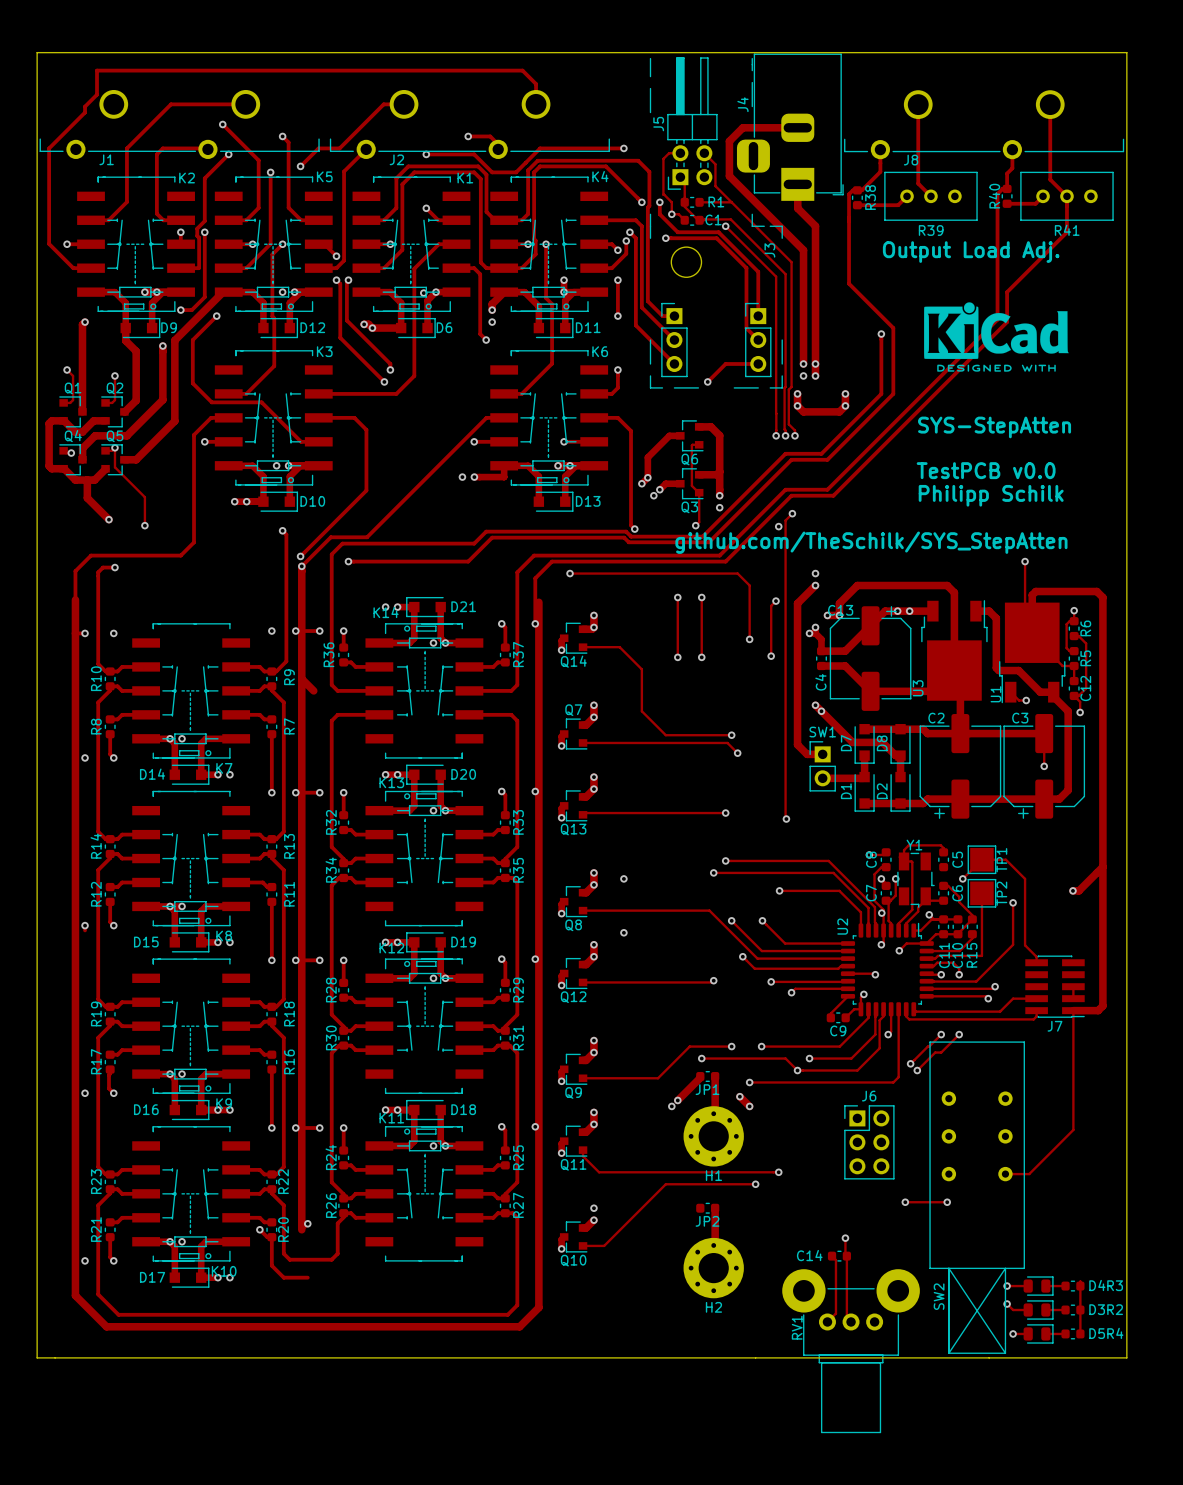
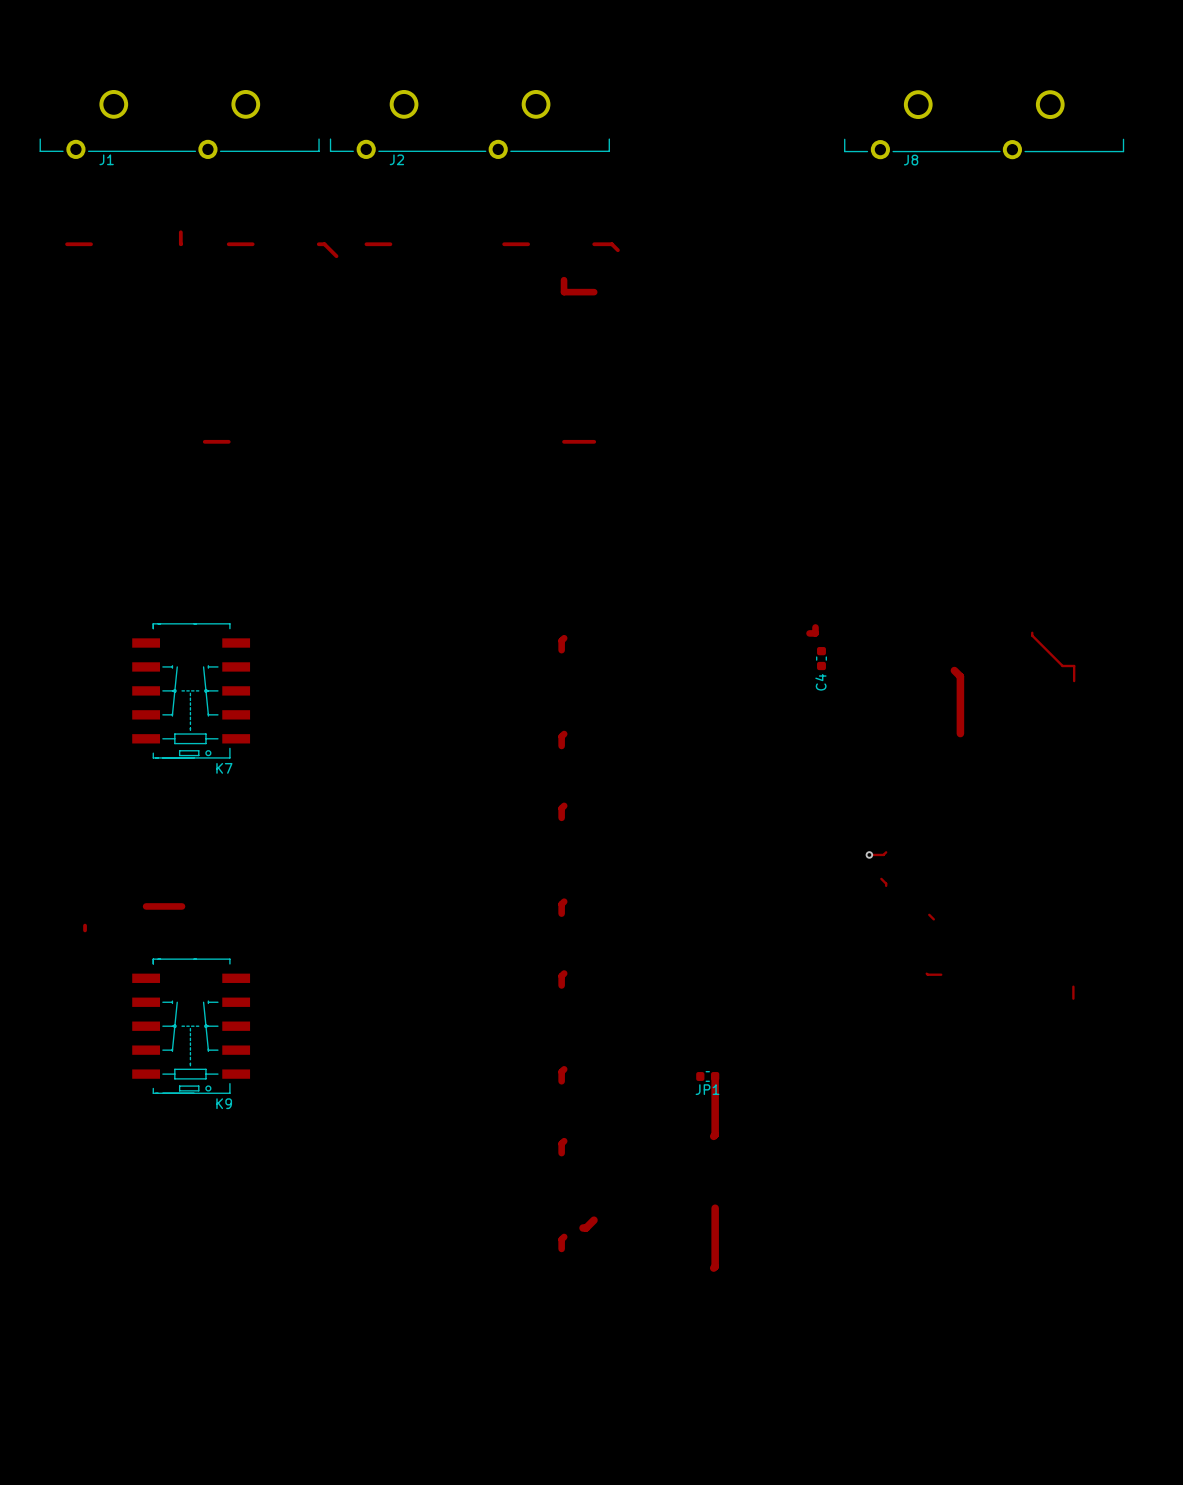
board edge: (37, 52) (37, 1357) (1126, 1357) (1126, 52) (37, 52) -> none
track: (245, 104) (171, 104) (126, 148) (126, 202) (108, 220) (91, 220) -> none
track: (404, 104) (383, 104) (339, 148) (318, 148) (300, 166) -> none
track: (536, 104) (536, 84) (522, 70) (97, 70) (97, 94) (85, 106) (85, 112) (49, 148) (49, 243) (73, 268) (91, 268) -> none
track: (918, 104) (918, 183) (930, 196) -> none
track: (1050, 104) (1050, 179) (1066, 196) (1066, 232) (1007, 292) (1007, 322) (833, 495) (791, 495) (725, 561) (552, 561) (535, 578) (535, 623) -> none
J5: (692, 123) -> none
track: (222, 124) (258, 160) (258, 208) (246, 220) (228, 220) -> none
via: (222, 124) -> none
J4: (790, 127) -> none
track: (797, 127) (742, 127) (729, 141) (729, 176) (803, 250) (803, 363) -> none
track: (282, 136) (288, 142) (288, 207) (301, 220) (318, 220) -> none
via: (282, 136) -> none
track: (468, 136) (490, 136) (503, 149) (498, 149) -> none
via: (468, 136) -> none
track: (623, 148) (540, 148) (516, 172) (492, 172) (474, 154) (426, 154) -> none
via: (623, 148) -> none
track: (207, 149) (209, 149) (162, 148) (156, 154) (156, 213) (163, 220) (181, 220) -> none
track: (366, 149) (344, 171) (344, 260) (336, 268) (318, 268) -> none
track: (880, 149) (880, 171) (861, 190) (852, 190) (849, 194) (849, 283) (893, 328) (893, 393) (827, 459) (791, 459) (709, 542) (628, 542) (624, 537) (492, 537) (468, 561) (348, 561) -> none
track: (1012, 149) (1012, 168) (1007, 173) (1007, 188) (1002, 188) (997, 194) (997, 319) (827, 489) (785, 489) (719, 555) (534, 555) (517, 572) (517, 684) (511, 690) (469, 690) -> none
track: (680, 153) (669, 153) (663, 158) (663, 194) (671, 202) (671, 214) (678, 214) (684, 220) -> none
track: (704, 153) (715, 164) (715, 186) (791, 262) (791, 387) (788, 389) (788, 424) (794, 430) (794, 435) -> none
track: (228, 154) (204, 178) (204, 221) (197, 228) (199, 267) (181, 268) -> none
via: (228, 154) -> none
via: (426, 154) -> none
via: (300, 166) -> none
track: (270, 172) (270, 243) (246, 268) (228, 268) -> none
via: (270, 172) -> none
track: (680, 177) (684, 181) (684, 206) (698, 220) (730, 219) (785, 274) (785, 435) -> none
track: (797, 184) (797, 208) (815, 226) (815, 375) -> none
track: (907, 196) (898, 205) (857, 205) -> none
R39: (930, 196) -> none
R40: (1007, 196) -> none
track: (1043, 196) (1035, 203) (1007, 203) -> none
R41: (1066, 196) -> none
R38: (857, 197) -> none
track: (641, 202) (605, 166) (540, 166) (534, 172) (535, 254) (521, 268) (486, 268) (480, 262) (480, 179) (474, 172) (414, 172) (402, 184) (402, 249) (384, 268) (366, 268) -> none
via: (641, 202) -> none
track: (659, 202) (659, 214) (677, 232) (718, 232) (758, 271) (758, 316) -> none
via: (659, 202) -> none
R1: (692, 202) -> none
track: (699, 202) (731, 202) -> none
track: (426, 208) (438, 220) (456, 220) -> none
via: (426, 208) -> none
via: (671, 214) -> none
track: (366, 220) (384, 220) (396, 208) (396, 178) (408, 166) (478, 166) (486, 174) (486, 211) (494, 220) (521, 220) (528, 214) (528, 170) (537, 160) (638, 160) (649, 171) (647, 301) (662, 316) (674, 316) -> none
track: (594, 220) (635, 220) (641, 226) (641, 307) (674, 340) -> none
C1: (692, 220) -> none
J3: (716, 223) -> none
track: (725, 226) (776, 276) (776, 435) -> none
via: (725, 226) -> none
via: (180, 232) -> none
track: (204, 232) (204, 297) (191, 310) (180, 310) -> none
via: (204, 232) -> none
track: (629, 232) (635, 238) (635, 325) (674, 363) -> none
via: (629, 232) -> none
track: (665, 238) (716, 238) (746, 268) (746, 328) (758, 340) -> none
via: (665, 238) -> none
track: (626, 240) (626, 253) (611, 268) (594, 268) -> none
via: (626, 240) -> none
via: (67, 244) -> none
K2: (136, 244) -> none
via: (252, 244) -> none
K5: (273, 244) -> none
track: (282, 244) (272, 254) (274, 366) (246, 393) (228, 393) -> none
via: (282, 244) -> none
via: (390, 244) -> none
K1: (411, 244) -> none
track: (456, 244) (438, 244) (414, 268) (414, 375) (396, 393) (318, 393) -> none
via: (528, 244) -> none
track: (546, 244) (546, 298) (552, 304) (552, 363) (521, 393) (504, 393) -> none
via: (546, 244) -> none
K4: (549, 244) -> none
via: (617, 250) -> none
text: Output Load Adj. (971, 252) -> none
via: (336, 256) -> none
track: (456, 268) (474, 268) (480, 274) (480, 334) (486, 340) -> none
track: (336, 280) (340, 283) (340, 337) (384, 381) -> none
via: (336, 280) -> none
track: (348, 280) (346, 281) (346, 320) (390, 363) (390, 369) -> none
via: (348, 280) -> none
via: (564, 280) -> none
track: (617, 280) (617, 316) -> none
via: (617, 280) -> none
track: (91, 292) (114, 292) (125, 302) (125, 340) (136, 351) (136, 400) (124, 411) -> none
track: (144, 292) (181, 292) (162, 292) (152, 302) (152, 328) -> none
via: (144, 292) -> none
via: (156, 292) -> none
via: (282, 292) -> none
track: (294, 292) (318, 292) (300, 292) (289, 302) (289, 328) -> none
via: (294, 292) -> none
track: (366, 292) (390, 292) (401, 302) (401, 328) (372, 328) (368, 324) (364, 324) -> none
via: (436, 292) -> none
track: (456, 292) (436, 292) (427, 300) (427, 328) -> none
via: (564, 292) -> none
track: (573, 292) (565, 300) (565, 328) -> none
via: (423, 293) -> none
drawing: [924, 302, 1069, 372] -> none
via: (180, 310) -> none
track: (492, 310) (492, 304) (504, 292) (524, 292) (538, 306) (538, 328) -> none
via: (492, 310) -> none
track: (216, 316) (192, 340) (192, 383) (211, 402) (261, 402) (301, 441) (318, 441) -> none
via: (216, 316) -> none
via: (617, 316) -> none
track: (85, 322) (82, 324) (82, 411) -> none
via: (85, 322) -> none
via: (492, 322) -> none
via: (364, 324) -> none
D9: (140, 328) -> none
track: (263, 328) (263, 302) (252, 292) (223, 292) (174, 340) (174, 421) (136, 459) (124, 459) -> none
D12: (278, 328) -> none
via: (372, 328) -> none
D6: (415, 328) -> none
D11: (553, 328) -> none
track: (881, 334) (881, 393) (821, 453) (785, 453) (702, 536) (631, 536) (626, 531) (486, 531) (474, 543) (342, 543) (331, 554) (331, 684) (337, 690) (379, 690) -> none
via: (881, 334) -> none
via: (486, 340) -> none
track: (162, 346) (162, 399) (126, 435) (95, 435) (82, 448) (82, 459) -> none
via: (162, 346) -> none
track: (758, 363) (725, 363) (707, 381) -> none
via: (803, 363) -> none
via: (815, 363) -> none
track: (67, 369) (73, 375) (73, 400) (70, 402) (63, 402) -> none
via: (67, 369) -> none
via: (390, 369) -> none
track: (617, 369) (617, 387) (611, 393) (594, 393) -> none
via: (617, 369) -> none
track: (114, 375) (114, 400) (112, 402) (105, 402) -> none
via: (114, 375) -> none
via: (803, 375) -> none
via: (815, 375) -> none
via: (384, 381) -> none
via: (707, 381) -> none
track: (797, 393) (797, 405) (803, 411) (839, 411) (845, 405) (845, 393) -> none
via: (797, 393) -> none
via: (845, 393) -> none
via: (797, 405) -> none
via: (845, 405) -> none
Q1: (73, 411) -> none
Q2: (114, 411) -> none
track: (228, 417) (211, 417) (194, 434) (194, 542) (180, 555) (91, 555) (75, 571) (75, 633) (85, 633) -> none
K3: (273, 417) -> none
track: (318, 417) (354, 417) (366, 429) (366, 490) (300, 556) -> none
track: (504, 417) (486, 417) (367, 537) (330, 537) (301, 566) -> none
K6: (549, 417) -> none
track: (594, 417) (617, 417) (631, 430) (631, 525) (634, 529) -> none
track: (105, 420) (93, 420) (82, 432) (75, 432) (64, 420) (51, 420) (49, 423) (49, 466) (51, 468) (64, 468) (75, 480) (94, 480) (105, 468) -> none
track: (699, 426) (710, 426) (719, 435) (719, 495) -> none
text: SYS-StepAtten (994, 427) -> none
track: (680, 435) (669, 435) (647, 457) (647, 477) (641, 483) -> none
Q6: (689, 435) -> none
via: (776, 435) -> none
via: (785, 435) -> none
via: (794, 435) -> none
via: (204, 441) -> none
track: (474, 441) (504, 441) -> none
via: (474, 441) -> none
via: (564, 441) -> none
track: (699, 444) (691, 445) (691, 485) (699, 492) (699, 522) (695, 525) -> none
via: (114, 447) -> none
track: (105, 450) (111, 450) (114, 447) (114, 467) (144, 497) (144, 525) -> none
via: (71, 453) -> none
Q4: (73, 459) -> none
Q5: (114, 459) -> none
track: (228, 465) (252, 465) (263, 476) (263, 501) (234, 501) -> none
via: (276, 465) -> none
track: (288, 465) (318, 465) (300, 465) (289, 476) (289, 501) -> none
via: (288, 465) -> none
track: (558, 465) (594, 465) (576, 465) (565, 476) (565, 501) -> none
via: (558, 465) -> none
via: (570, 465) -> none
text: TestPCB v0.0 (986, 470) -> none
track: (719, 471) (716, 474) (699, 474) -> none
via: (462, 477) -> none
track: (474, 477) (504, 477) -> none
via: (474, 477) -> none
track: (504, 477) (504, 465) (528, 465) (538, 476) (538, 501) -> none
via: (647, 477) -> none
track: (87, 480) (87, 498) (108, 519) -> none
via: (641, 483) -> none
track: (680, 483) (665, 483) (659, 489) -> none
Q3: (689, 483) -> none
via: (659, 489) -> none
via: (653, 495) -> none
via: (719, 495) -> none
text: Philipp Schilk (991, 495) -> none
via: (234, 501) -> none
via: (246, 501) -> none
D10: (278, 501) -> none
D13: (553, 501) -> none
via: (719, 507) -> none
track: (792, 513) (785, 520) (786, 819) -> none
via: (792, 513) -> none
via: (108, 519) -> none
via: (144, 525) -> none
via: (695, 525) -> none
via: (778, 526) -> none
via: (634, 529) -> none
track: (282, 530) (286, 534) (286, 661) (276, 671) (264, 671) (259, 666) (236, 666) -> none
via: (282, 530) -> none
text: github.com/TheSchilk/SYS_StepAtten (871, 542) -> none
via: (300, 556) -> none
via: (348, 561) -> none
track: (1025, 561) (1025, 625) (1032, 632) (1032, 595) (1035, 591) (1096, 591) (1102, 597) (1102, 1005) (1098, 1010) (1073, 1010) (1073, 1129) (1029, 1174) (1005, 1174) -> none
via: (1025, 561) -> none
track: (301, 566) (301, 1229) (307, 1223) -> none
via: (301, 566) -> none
track: (114, 567) (102, 567) (98, 572) (98, 664) (105, 671) (117, 671) (122, 666) (146, 666) -> none
via: (114, 567) -> none
track: (570, 573) (737, 573) (749, 585) (749, 639) -> none
via: (570, 573) -> none
via: (815, 573) -> none
track: (815, 585) (797, 603) (797, 744) (807, 754) (822, 754) -> none
via: (815, 585) -> none
track: (677, 597) (677, 657) -> none
via: (677, 597) -> none
track: (701, 597) (701, 657) -> none
via: (701, 597) -> none
track: (75, 599) (75, 1295) (106, 1326) (519, 1326) (538, 1307) (538, 602) -> none
track: (775, 601) (771, 605) (771, 656) -> none
via: (775, 601) -> none
via: (385, 607) -> none
track: (397, 607) (414, 607) (414, 638) (409, 643) (379, 643) -> none
via: (397, 607) -> none
D21: (426, 607) -> none
track: (440, 607) (440, 638) (445, 643) (469, 643) -> none
track: (1074, 610) (1074, 621) (1069, 621) (1066, 624) (1066, 648) (1069, 651) (1074, 651) -> none
via: (1074, 610) -> none
via: (897, 611) -> none
via: (909, 611) -> none
track: (932, 611) (885, 611) (845, 651) (822, 651) -> none
track: (975, 611) (989, 611) (996, 618) (996, 667) (998, 670) (1018, 670) (1040, 692) (1053, 692) (1053, 696) (1068, 711) (1068, 790) (1059, 799) (927, 799) (923, 803) (864, 803) -> none
track: (593, 615) (593, 627) (583, 629) -> none
via: (593, 615) -> none
track: (827, 615) (839, 615) (839, 603) (857, 585) (947, 585) (954, 592) (954, 670) (933, 691) (870, 691) (845, 665) (822, 665) -> none
via: (827, 615) -> none
via: (839, 615) -> none
track: (501, 623) (505, 627) (505, 647) -> none
via: (501, 623) -> none
via: (535, 623) -> none
via: (593, 627) -> none
via: (815, 627) -> none
R6: (1074, 628) -> none
via: (271, 631) -> none
track: (295, 631) (319, 631) -> none
via: (295, 631) -> none
via: (319, 631) -> none
track: (343, 631) (343, 647) -> none
via: (343, 631) -> none
via: (85, 633) -> none
via: (113, 633) -> none
via: (809, 633) -> none
track: (815, 633) (821, 639) (821, 651) -> none
track: (1074, 636) (1078, 636) (1086, 643) (1086, 688) (1078, 695) (1074, 695) (1080, 701) (1080, 712) -> none
Q14: (573, 638) -> none
via: (749, 639) -> none
via: (433, 643) -> none
via: (445, 643) -> none
track: (583, 647) (619, 647) (641, 669) (641, 711) (665, 735) (731, 735) -> none
via: (561, 650) -> none
U3: (954, 650) -> none
U1: (1032, 652) -> none
R36: (343, 654) -> none
R37: (505, 654) -> none
via: (771, 656) -> none
via: (677, 657) -> none
via: (701, 657) -> none
C13: (870, 658) -> none
R5: (1074, 658) -> none
track: (343, 662) (351, 662) (355, 666) (379, 666) -> none
track: (505, 662) (497, 662) (493, 666) (469, 666) -> none
R10: (110, 678) -> none
R9: (271, 678) -> none
track: (301, 678) (313, 690) -> none
C12: (1074, 688) -> none
track: (146, 690) (122, 690) (117, 686) (110, 686) (110, 690) (98, 702) (98, 831) (105, 839) (117, 839) (122, 834) (146, 834) -> none
track: (236, 690) (259, 690) (264, 686) (271, 686) (271, 690) (283, 702) (283, 831) (276, 839) (264, 839) (259, 834) (236, 834) -> none
K14: (424, 690) -> none
track: (1010, 692) (1019, 700) (1026, 700) -> none
via: (1026, 700) -> none
track: (593, 705) (593, 717) (586, 725) (583, 725) -> none
via: (593, 705) -> none
track: (815, 705) (852, 742) (882, 742) (895, 755) (900, 755) (900, 777) -> none
via: (815, 705) -> none
via: (821, 711) -> none
via: (1080, 712) -> none
track: (146, 714) (122, 714) (117, 719) (110, 719) -> none
track: (236, 714) (259, 714) (264, 719) (271, 719) -> none
track: (379, 714) (337, 714) (331, 720) (331, 847) (343, 858) (343, 863) (351, 863) (355, 858) (379, 858) -> none
track: (469, 714) (511, 714) (517, 720) (517, 847) (505, 858) (505, 863) (497, 863) (493, 858) (469, 858) -> none
via: (593, 717) -> none
R8: (110, 726) -> none
R7: (271, 726) -> none
track: (864, 729) (923, 729) (927, 733) (1044, 733) (1044, 766) -> none
track: (110, 734) (110, 754) (113, 757) -> none
track: (271, 734) (271, 792) -> none
Q7: (573, 734) -> none
via: (731, 735) -> none
track: (146, 738) (170, 738) (174, 743) (174, 774) -> none
via: (170, 738) -> none
via: (182, 738) -> none
track: (236, 738) (205, 738) (201, 743) (201, 774) (217, 774) -> none
track: (583, 742) (727, 742) (737, 753) -> none
D7: (864, 743) -> none
D8: (900, 743) -> none
via: (561, 745) -> none
via: (737, 753) -> none
track: (864, 755) (863, 778) (822, 778) -> none
via: (85, 757) -> none
via: (113, 757) -> none
SW1: (822, 766) -> none
C2: (960, 766) -> none
C3: (1044, 766) -> none
via: (1044, 766) -> none
D14: (189, 774) -> none
via: (217, 774) -> none
via: (229, 774) -> none
track: (385, 774) (414, 774) (414, 805) (409, 810) (379, 810) -> none
via: (385, 774) -> none
via: (397, 774) -> none
D20: (426, 774) -> none
track: (440, 774) (440, 805) (445, 810) (469, 810) -> none
track: (593, 777) (593, 789) (586, 796) (583, 796) -> none
via: (593, 777) -> none
via: (593, 789) -> none
track: (501, 791) (505, 795) (505, 815) -> none
via: (501, 791) -> none
via: (535, 791) -> none
D1: (864, 791) -> none
D2: (900, 791) -> none
via: (271, 792) -> none
track: (295, 792) (319, 792) -> none
via: (295, 792) -> none
via: (319, 792) -> none
track: (343, 792) (343, 815) -> none
via: (343, 792) -> none
Q13: (573, 805) -> none
via: (433, 810) -> none
via: (445, 810) -> none
track: (725, 813) (584, 813) (583, 814) -> none
via: (725, 813) -> none
via: (561, 817) -> none
via: (786, 819) -> none
R32: (343, 822) -> none
R33: (505, 822) -> none
track: (343, 830) (351, 830) (355, 834) (379, 834) -> none
track: (505, 830) (497, 830) (493, 834) (469, 834) -> none
R14: (110, 846) -> none
R13: (271, 846) -> none
track: (943, 852) (943, 848) (940, 845) (908, 845) (904, 850) (904, 861) -> none
track: (146, 858) (122, 858) (117, 854) (110, 854) (110, 858) (98, 870) (98, 999) (105, 1006) (117, 1006) (122, 1002) (146, 1002) -> none
K8: (191, 858) -> none
track: (236, 858) (259, 858) (264, 854) (271, 854) (271, 858) (283, 870) (283, 999) (276, 1006) (264, 1006) (259, 1002) (236, 1002) -> none
K13: (424, 858) -> none
C8: (886, 859) -> none
C5: (943, 859) -> none
TP1: (981, 859) -> none
track: (725, 860) (828, 860) (874, 907) (876, 931) -> none
via: (725, 860) -> none
track: (904, 861) (912, 862) (912, 909) (898, 923) (898, 930) -> none
track: (1102, 866) (1078, 890) (1072, 890) -> none
track: (886, 867) (881, 867) (874, 874) (874, 900) (883, 909) (883, 942) (881, 944) -> none
R34: (343, 870) -> none
R35: (505, 870) -> none
track: (593, 872) (593, 884) (586, 892) (583, 892) -> none
via: (593, 872) -> none
track: (713, 872) (833, 872) (868, 907) (868, 930) -> none
via: (713, 872) -> none
via: (623, 878) -> none
via: (881, 878) -> none
track: (895, 878) (895, 895) (888, 902) (888, 920) (891, 923) (891, 930) -> none
via: (895, 878) -> none
track: (962, 878) (981, 859) (1005, 859) (1025, 878) (1025, 945) (1036, 956) (1036, 962) -> none
via: (962, 878) -> none
Y1: (916, 880) -> none
track: (146, 882) (122, 882) (117, 887) (110, 887) -> none
track: (236, 882) (262, 882) (267, 887) (271, 887) -> none
track: (379, 882) (355, 882) (351, 877) (339, 877) (331, 885) (331, 1014) (343, 1026) (343, 1030) (351, 1030) (355, 1026) (379, 1026) -> none
track: (469, 882) (493, 882) (497, 877) (512, 877) (517, 882) (517, 1014) (505, 1026) (505, 1030) (497, 1030) (493, 1026) (469, 1026) -> none
via: (593, 884) -> none
track: (943, 885) (948, 885) (959, 896) (959, 902) (972, 915) (972, 919) (958, 934) (936, 934) (926, 943) (906, 943) (899, 950) -> none
track: (779, 890) (839, 890) (860, 912) (860, 930) -> none
via: (779, 890) -> none
via: (1072, 890) -> none
C7: (886, 893) -> none
C6: (943, 893) -> none
track: (981, 893) (981, 955) (937, 955) (935, 958) (926, 958) -> none
TP2: (981, 893) -> none
R12: (110, 894) -> none
R11: (271, 894) -> none
track: (943, 900) (930, 900) (925, 896) (925, 900) (918, 907) (918, 911) (906, 923) (906, 930) -> none
track: (110, 901) (110, 922) (113, 925) -> none
track: (271, 901) (271, 960) -> none
Q8: (573, 901) -> none
track: (1013, 902) (1013, 944) (976, 981) (926, 981) -> none
via: (1013, 902) -> none
track: (170, 906) (174, 911) (174, 942) -> none
via: (170, 906) -> none
via: (182, 906) -> none
track: (236, 906) (205, 906) (201, 911) (201, 942) (217, 942) -> none
track: (583, 910) (709, 910) (757, 958) (847, 958) -> none
via: (561, 913) -> none
via: (881, 913) -> none
via: (929, 914) -> none
track: (958, 919) (931, 919) (920, 930) (913, 930) -> none
track: (731, 920) (761, 951) (847, 951) -> none
via: (731, 920) -> none
track: (762, 920) (785, 943) (847, 943) -> none
via: (762, 920) -> none
via: (85, 925) -> none
via: (113, 925) -> none
C11: (943, 926) -> none
C10: (958, 926) -> none
R15: (972, 926) -> none
via: (623, 932) -> none
track: (972, 934) (972, 938) (959, 951) (926, 951) -> none
D15: (189, 942) -> none
via: (217, 942) -> none
via: (229, 942) -> none
track: (385, 942) (414, 942) (414, 973) (409, 978) (379, 978) -> none
via: (385, 942) -> none
via: (397, 942) -> none
D19: (426, 942) -> none
track: (440, 942) (440, 973) (445, 978) (469, 978) -> none
track: (593, 944) (593, 956) (586, 964) (583, 964) -> none
via: (593, 944) -> none
via: (881, 944) -> none
via: (899, 950) -> none
via: (593, 956) -> none
track: (742, 956) (754, 968) (838, 968) (840, 966) (847, 966) -> none
via: (742, 956) -> none
track: (501, 959) (505, 962) (505, 982) -> none
via: (501, 959) -> none
via: (535, 959) -> none
via: (271, 960) -> none
track: (295, 960) (319, 960) -> none
via: (295, 960) -> none
via: (319, 960) -> none
track: (343, 960) (343, 982) -> none
via: (343, 960) -> none
track: (926, 966) (933, 966) (937, 962) (953, 962) (959, 968) (959, 974) -> none
U2: (887, 969) -> none
Q12: (573, 973) -> none
track: (847, 973) (875, 974) -> none
via: (875, 974) -> none
via: (941, 974) -> none
via: (959, 974) -> none
via: (433, 978) -> none
via: (445, 978) -> none
track: (713, 980) (711, 982) (583, 982) -> none
via: (713, 980) -> none
via: (771, 981) -> none
track: (847, 981) (771, 981) -> none
via: (561, 985) -> none
track: (995, 986) (993, 988) (926, 988) -> none
via: (995, 986) -> none
J7: (1055, 986) -> none
track: (847, 988) (795, 988) (791, 992) -> none
R28: (343, 990) -> none
R29: (505, 990) -> none
via: (791, 992) -> none
track: (863, 994) (860, 997) (860, 1009) (854, 1009) (845, 1017) -> none
via: (863, 994) -> none
track: (847, 996) (830, 1013) (830, 1017) -> none
track: (926, 996) (985, 996) (988, 998) -> none
track: (343, 997) (351, 997) (355, 1002) (379, 1002) -> none
track: (505, 997) (497, 997) (493, 1002) (469, 1002) -> none
via: (988, 998) -> none
track: (1036, 998) (1013, 998) (1000, 1011) (916, 1011) (913, 1009) -> none
track: (868, 1009) (868, 1017) (839, 1046) (761, 1046) -> none
track: (876, 1009) (875, 1034) (851, 1058) (809, 1058) -> none
track: (883, 1009) (883, 1016) (879, 1020) (879, 1048) (857, 1070) (797, 1070) (785, 1058) (701, 1058) -> none
track: (891, 1009) (891, 1031) (888, 1034) -> none
track: (898, 1009) (898, 1077) (893, 1082) (749, 1082) -> none
track: (906, 1009) (906, 1016) (909, 1019) (1033, 1019) (1036, 1016) (1036, 1010) -> none
R19: (110, 1014) -> none
R18: (271, 1014) -> none
C9: (838, 1017) -> none
track: (146, 1026) (122, 1026) (117, 1021) (110, 1021) (110, 1025) (98, 1037) (98, 1166) (105, 1174) (117, 1174) (122, 1169) (146, 1169) -> none
track: (236, 1026) (259, 1026) (264, 1021) (271, 1021) (271, 1025) (283, 1037) (283, 1166) (276, 1174) (264, 1174) (259, 1169) (236, 1169) -> none
K12: (424, 1026) -> none
via: (888, 1034) -> none
track: (941, 1034) (910, 1063) -> none
via: (941, 1034) -> none
track: (959, 1034) (941, 1052) (935, 1052) (917, 1070) -> none
via: (959, 1034) -> none
R30: (343, 1038) -> none
R31: (505, 1038) -> none
track: (593, 1040) (593, 1052) (586, 1060) (583, 1060) -> none
via: (593, 1040) -> none
track: (731, 1046) (689, 1046) (658, 1078) (583, 1078) -> none
via: (731, 1046) -> none
via: (761, 1046) -> none
track: (146, 1050) (122, 1050) (117, 1054) (110, 1054) -> none
track: (236, 1050) (259, 1050) (264, 1054) (271, 1054) -> none
track: (379, 1050) (355, 1050) (351, 1045) (339, 1045) (331, 1053) (331, 1182) (343, 1194) (343, 1198) (351, 1198) (355, 1193) (379, 1193) -> none
track: (469, 1050) (493, 1050) (497, 1045) (509, 1045) (517, 1053) (517, 1182) (505, 1194) (505, 1198) (497, 1198) (493, 1193) (469, 1193) -> none
via: (593, 1052) -> none
via: (701, 1058) -> none
via: (809, 1058) -> none
R17: (110, 1062) -> none
R16: (271, 1062) -> none
via: (910, 1063) -> none
track: (110, 1069) (108, 1088) (113, 1093) -> none
track: (271, 1069) (271, 1127) -> none
Q9: (573, 1069) -> none
via: (797, 1070) -> none
via: (917, 1070) -> none
track: (146, 1074) (170, 1074) (174, 1078) (174, 1110) -> none
via: (170, 1074) -> none
via: (182, 1074) -> none
track: (236, 1074) (205, 1074) (201, 1078) (201, 1110) (229, 1110) -> none
track: (700, 1076) (677, 1100) -> none
via: (561, 1081) -> none
via: (749, 1082) -> none
via: (85, 1093) -> none
via: (113, 1093) -> none
track: (739, 1096) (749, 1106) -> none
via: (739, 1096) -> none
via: (677, 1100) -> none
via: (671, 1106) -> none
via: (749, 1106) -> none
D16: (189, 1110) -> none
via: (217, 1110) -> none
via: (229, 1110) -> none
track: (385, 1110) (414, 1110) (414, 1141) (409, 1145) (379, 1145) -> none
via: (385, 1110) -> none
via: (397, 1110) -> none
D18: (426, 1110) -> none
track: (440, 1110) (440, 1141) (445, 1145) (469, 1145) -> none
track: (593, 1112) (593, 1124) (586, 1132) (583, 1132) -> none
via: (593, 1112) -> none
via: (593, 1124) -> none
track: (501, 1126) (505, 1130) (505, 1150) -> none
via: (501, 1126) -> none
via: (535, 1126) -> none
via: (271, 1127) -> none
track: (295, 1127) (319, 1127) -> none
via: (295, 1127) -> none
via: (319, 1127) -> none
track: (343, 1127) (343, 1150) -> none
via: (343, 1127) -> none
H1: (713, 1136) -> none
Q11: (573, 1141) -> none
J6: (869, 1142) -> none
via: (433, 1145) -> none
via: (445, 1145) -> none
track: (583, 1150) (583, 1156) (599, 1172) (778, 1172) -> none
via: (561, 1153) -> none
R24: (343, 1157) -> none
R25: (505, 1157) -> none
track: (343, 1165) (351, 1165) (355, 1169) (379, 1169) -> none
track: (505, 1165) (497, 1165) (493, 1169) (469, 1169) -> none
via: (778, 1172) -> none
R23: (110, 1181) -> none
R22: (271, 1181) -> none
track: (755, 1184) (665, 1184) (604, 1245) (583, 1245) -> none
via: (755, 1184) -> none
track: (146, 1193) (122, 1193) (117, 1189) (110, 1189) (110, 1193) (98, 1205) (98, 1294) (118, 1314) (507, 1314) (517, 1305) (517, 1217) (512, 1213) (497, 1213) (493, 1217) (469, 1217) -> none
K10: (191, 1193) -> none
track: (236, 1193) (259, 1193) (264, 1189) (271, 1189) (271, 1193) (283, 1205) (283, 1253) (289, 1259) (331, 1259) (337, 1253) (337, 1223) (343, 1217) (343, 1213) (351, 1213) (355, 1217) (379, 1217) -> none
K11: (424, 1193) -> none
SW2: (977, 1197) -> none
track: (905, 1202) (947, 1202) -> none
via: (905, 1202) -> none
via: (947, 1202) -> none
R26: (343, 1205) -> none
R27: (505, 1205) -> none
via: (593, 1208) -> none
JP2: (707, 1208) -> none
track: (146, 1217) (122, 1217) (117, 1222) (110, 1222) -> none
track: (236, 1217) (259, 1217) (264, 1222) (271, 1222) -> none
via: (593, 1220) -> none
via: (307, 1223) -> none
R21: (110, 1229) -> none
track: (259, 1229) (267, 1237) (271, 1237) (271, 1265) (283, 1277) (307, 1277) -> none
via: (259, 1229) -> none
R20: (271, 1229) -> none
Q10: (573, 1236) -> none
track: (110, 1237) (110, 1257) (113, 1260) -> none
track: (845, 1238) (846, 1317) (851, 1321) -> none
via: (845, 1238) -> none
track: (146, 1241) (170, 1241) (174, 1246) (174, 1277) -> none
via: (170, 1241) -> none
via: (182, 1241) -> none
track: (236, 1241) (205, 1241) (201, 1246) (201, 1277) (217, 1277) -> none
via: (561, 1248) -> none
track: (832, 1256) (835, 1260) (835, 1313) (827, 1321) -> none
C14: (839, 1256) -> none
via: (85, 1260) -> none
via: (113, 1260) -> none
H2: (713, 1268) -> none
D17: (189, 1277) -> none
via: (217, 1277) -> none
via: (229, 1277) -> none
track: (1080, 1281) (1080, 1333) -> none
track: (1007, 1286) (1028, 1286) -> none
via: (1007, 1286) -> none
D4: (1038, 1286) -> none
track: (1045, 1286) (1065, 1286) -> none
R3: (1072, 1286) -> none
track: (1007, 1304) (1013, 1310) (1028, 1310) -> none
via: (1007, 1304) -> none
D3: (1038, 1310) -> none
track: (1045, 1310) (1065, 1310) -> none
R2: (1072, 1310) -> none
track: (1013, 1333) (1028, 1333) -> none
via: (1013, 1333) -> none
D5: (1038, 1333) -> none
track: (1045, 1333) (1065, 1333) -> none
R4: (1072, 1333) -> none
RV1: (851, 1351) -> none

